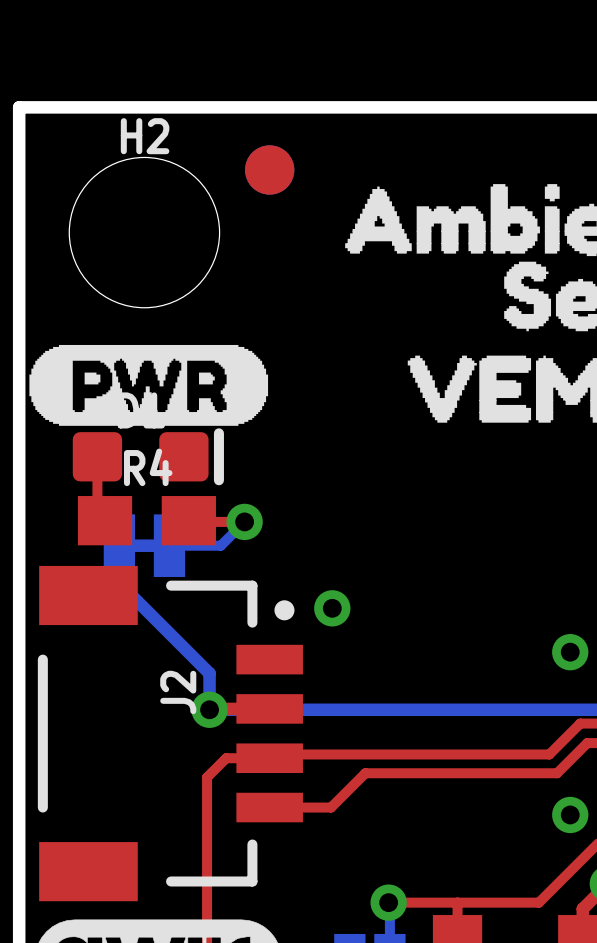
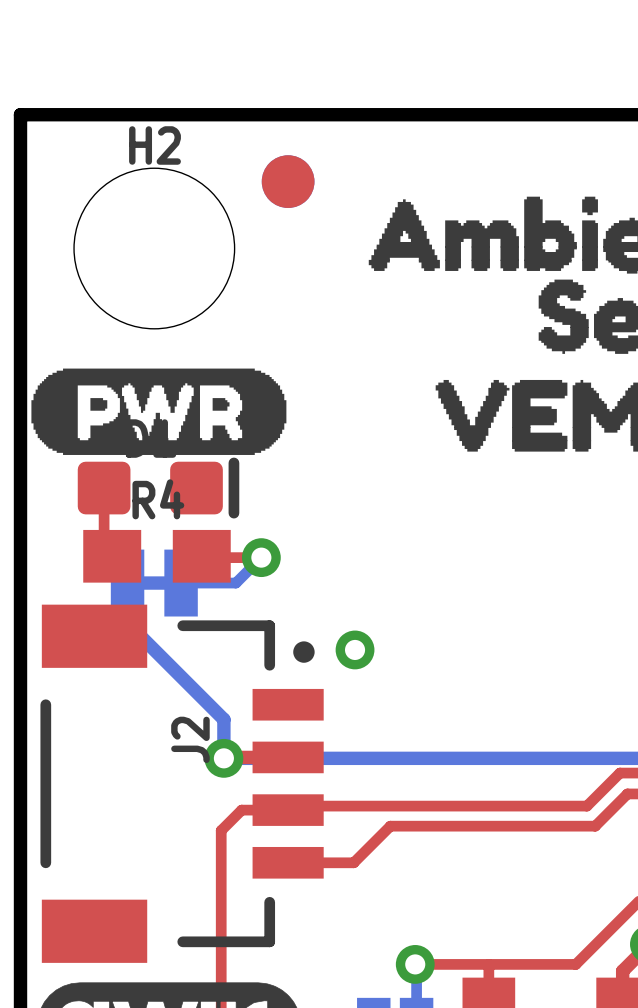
via: (570, 652) -> none
via: (570, 814) -> none

